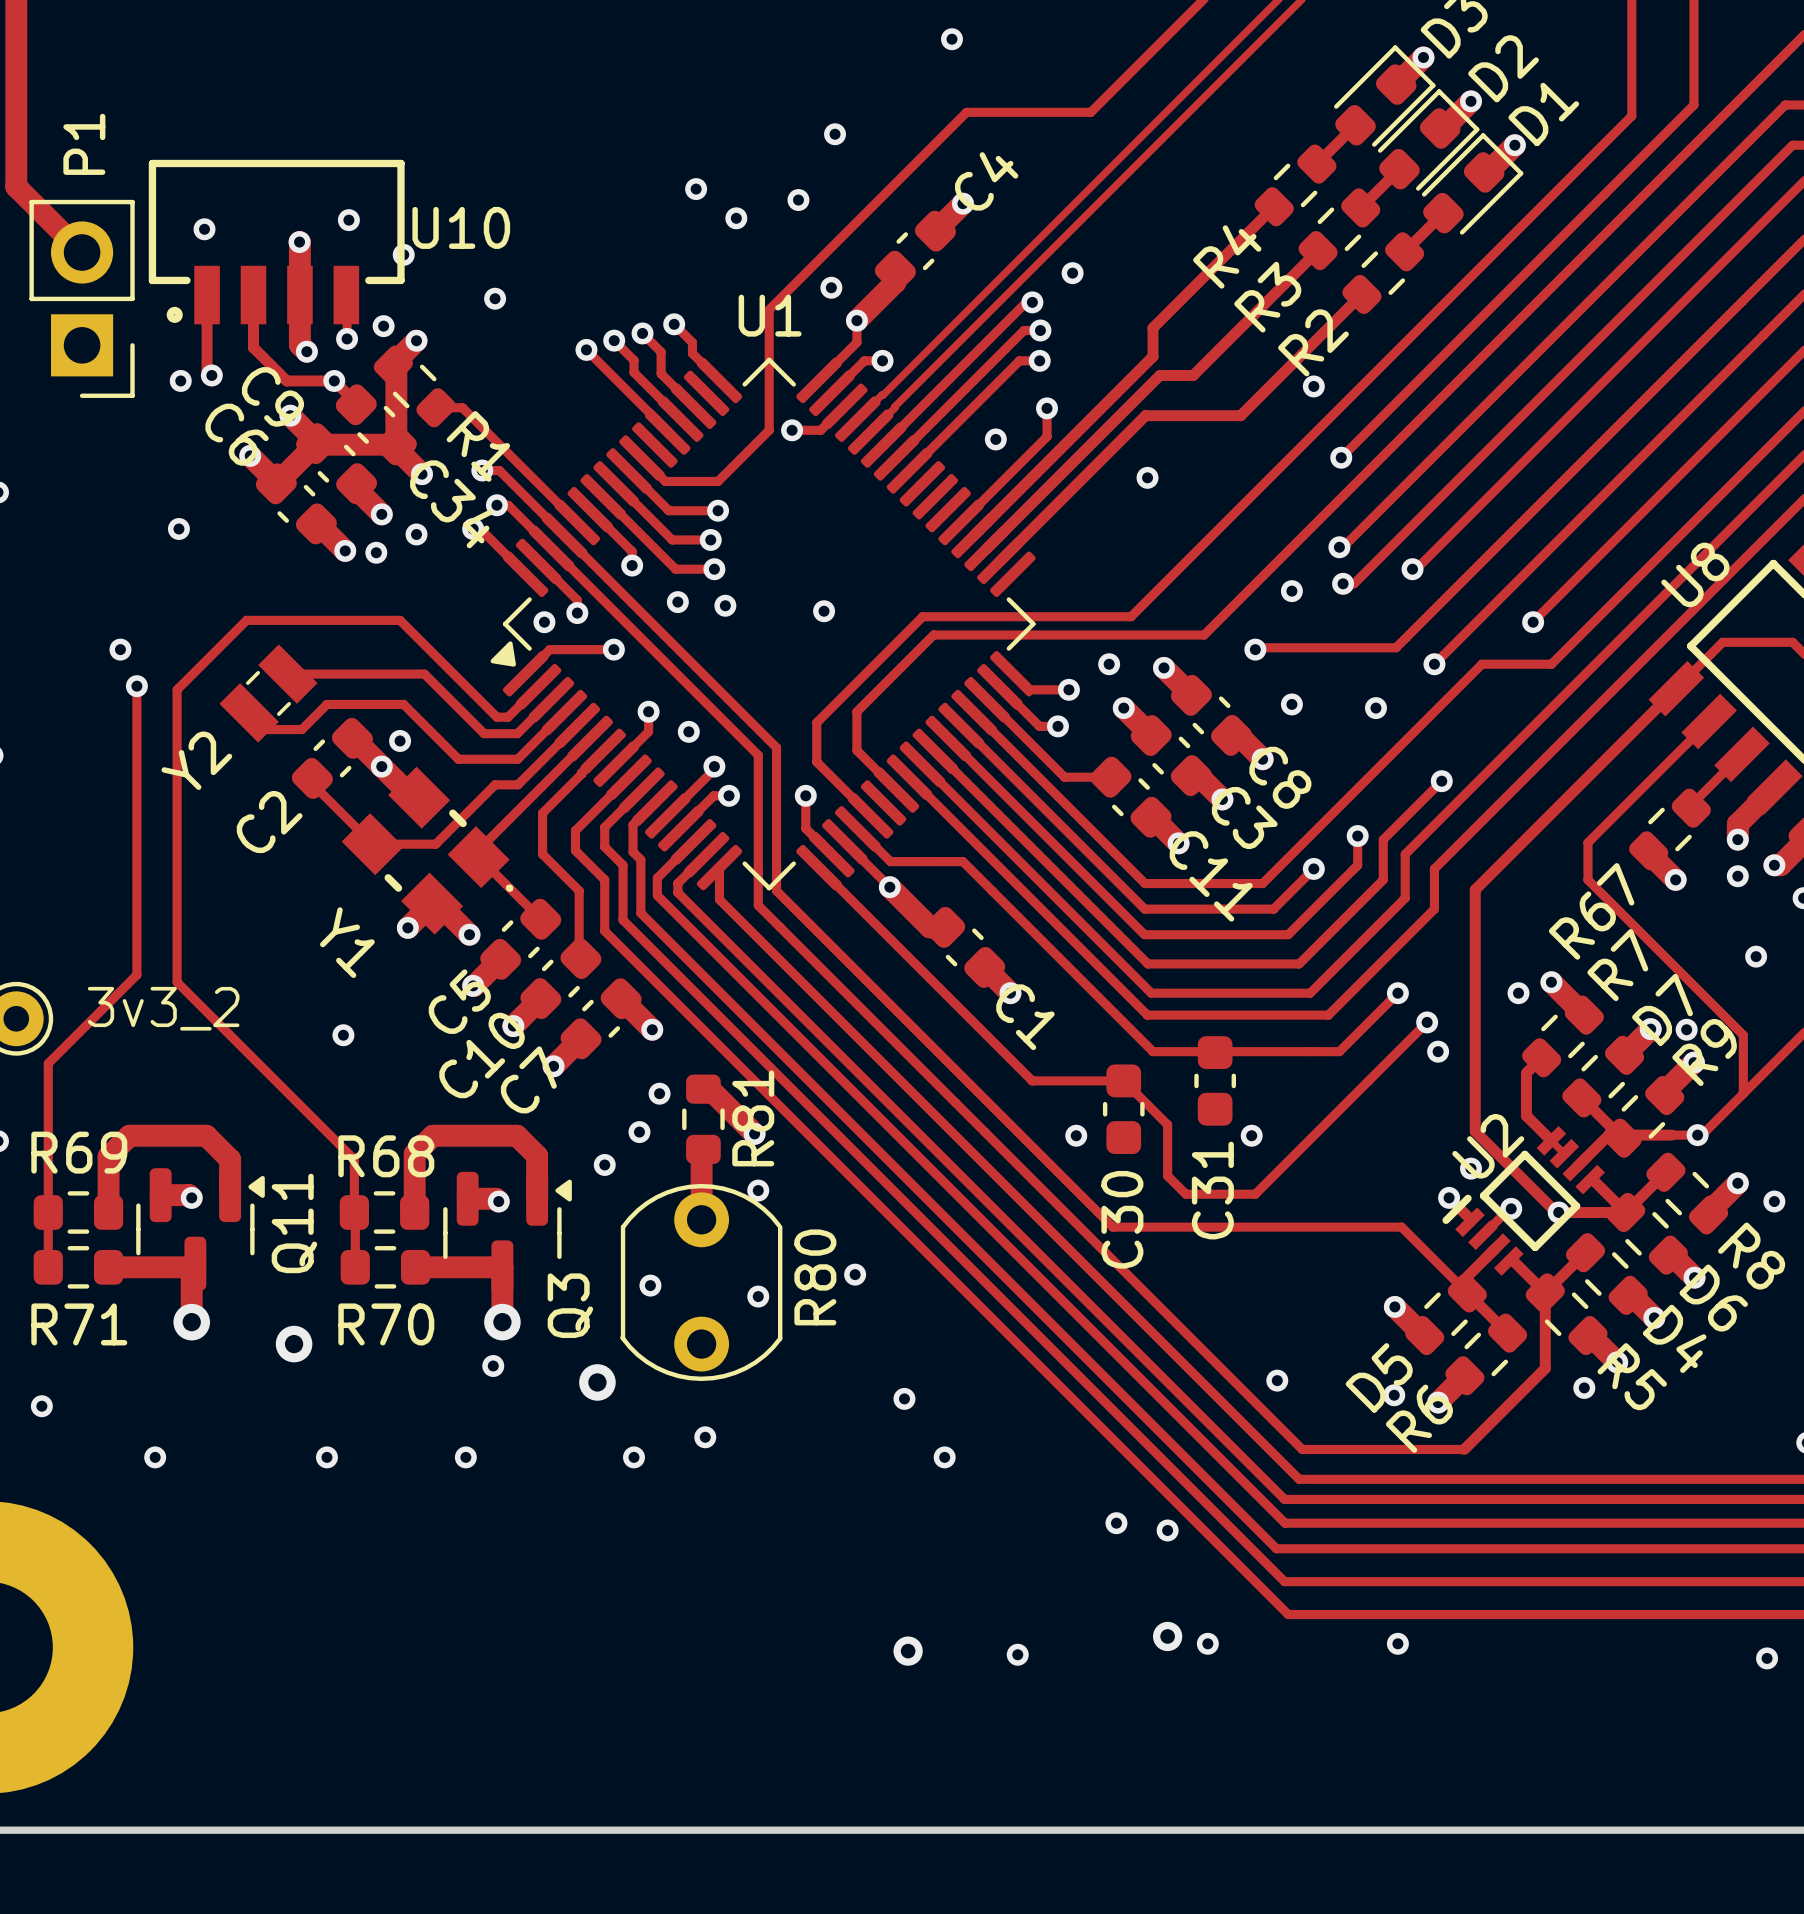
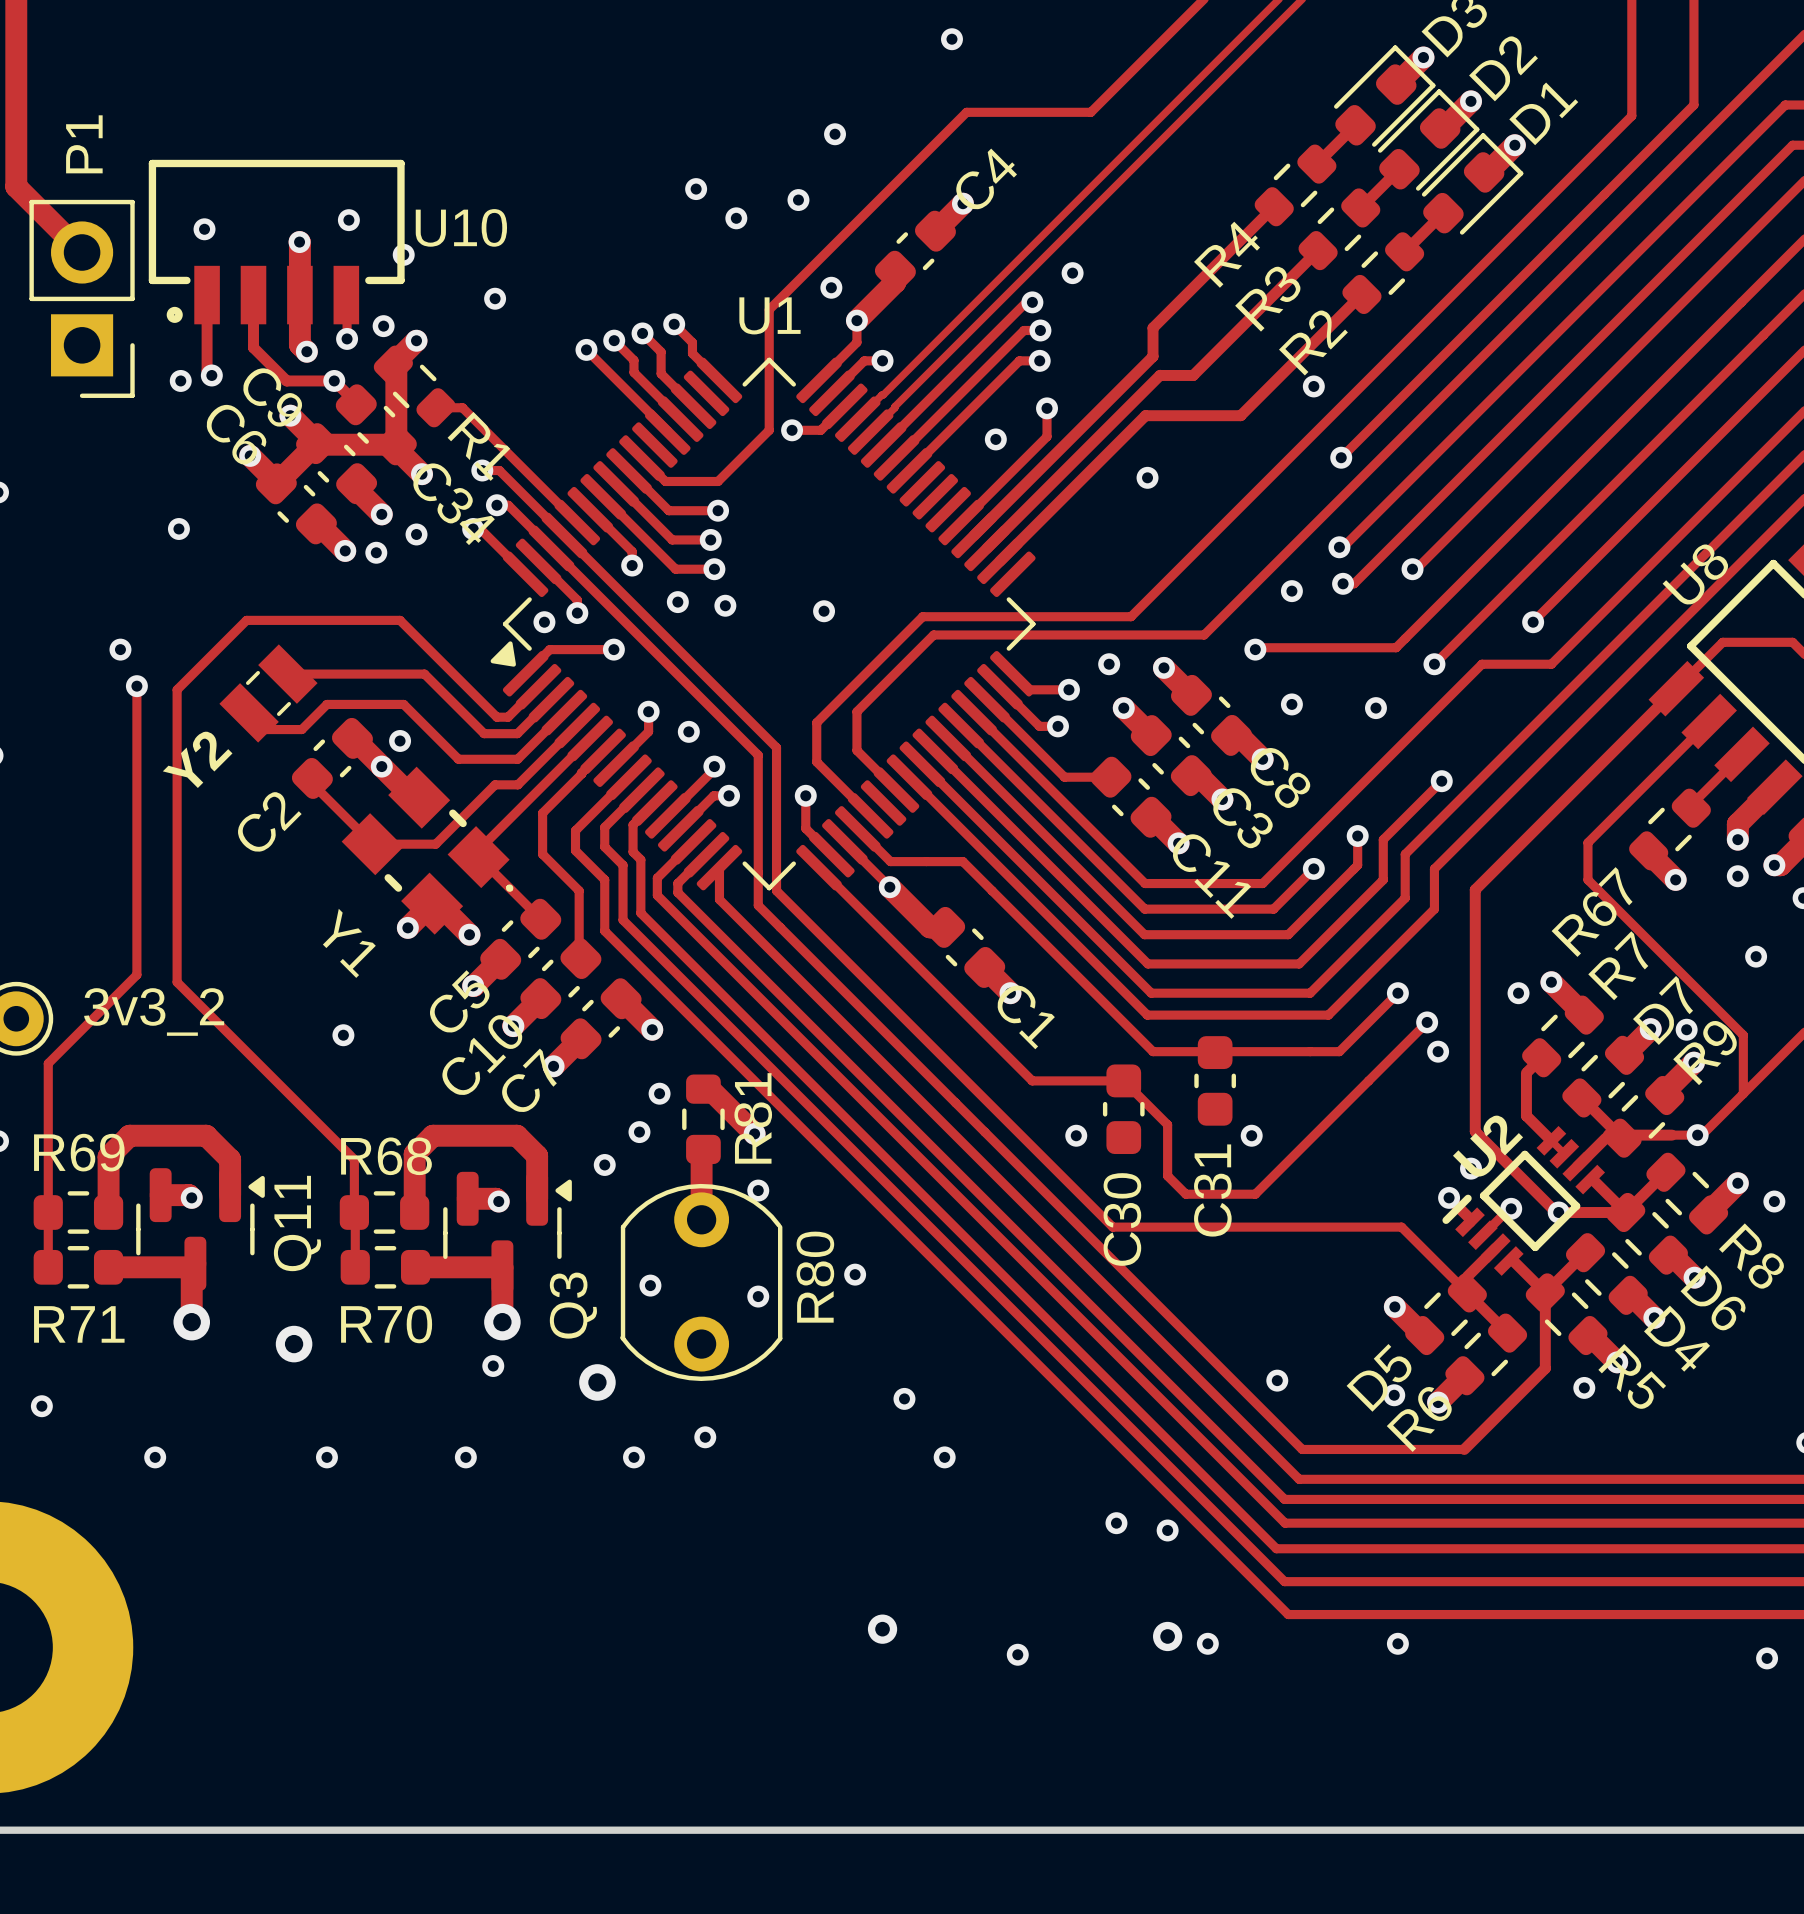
via position: (908, 1651) -> (882, 1629)

